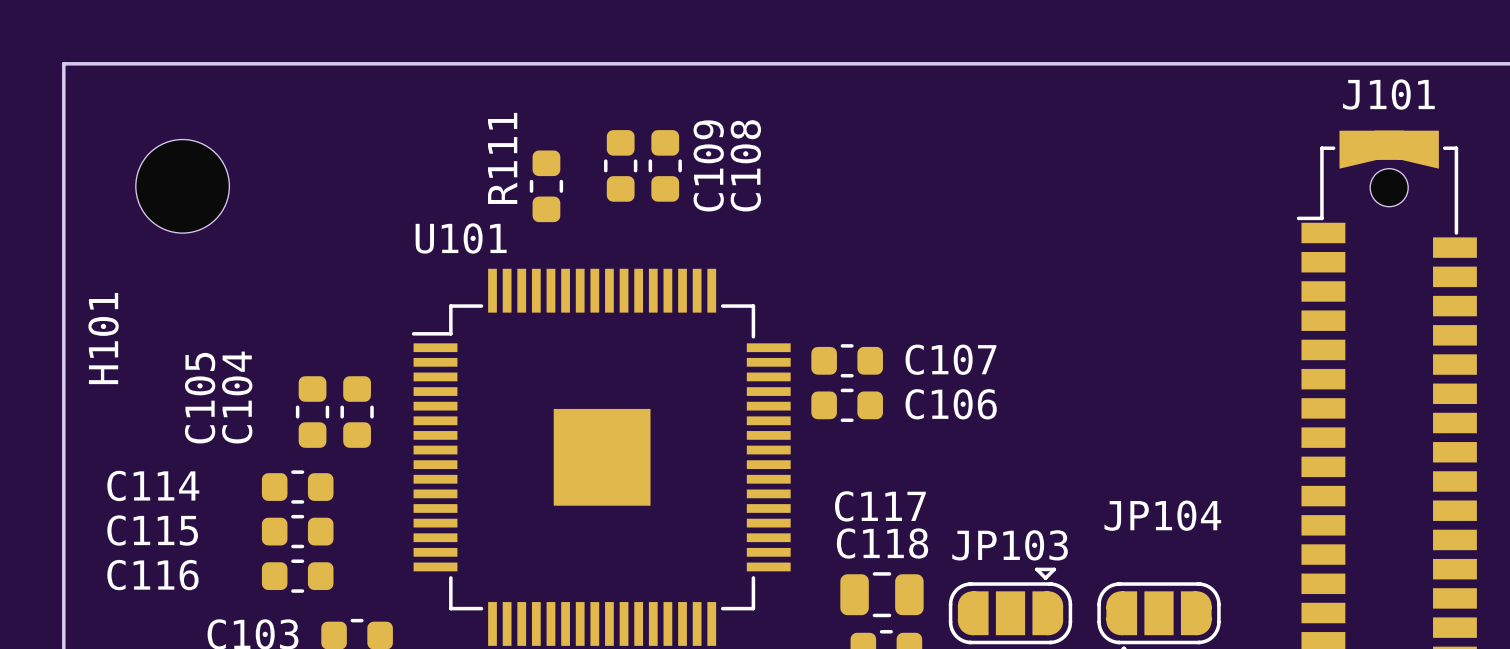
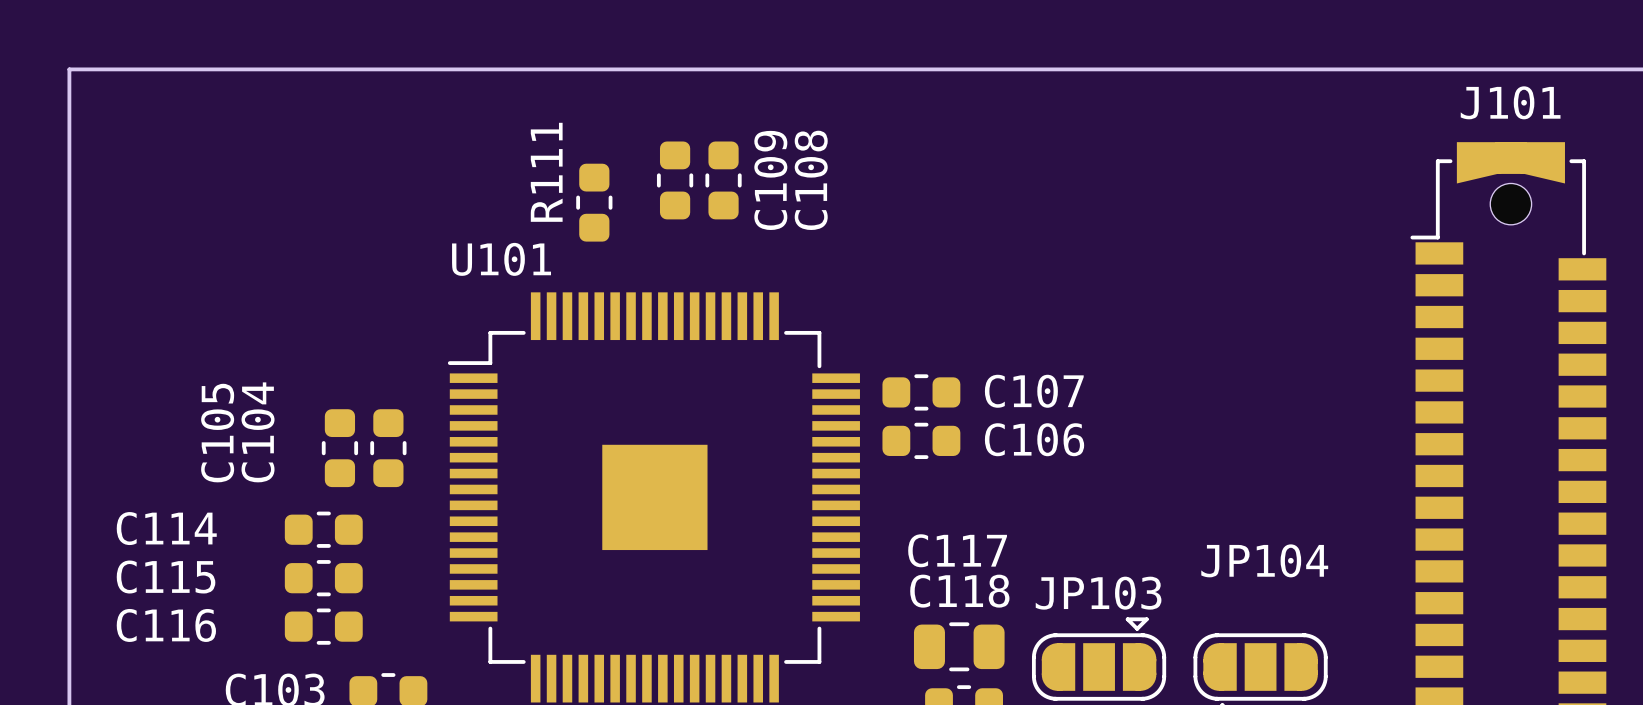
H101: (182, 186) -> none

